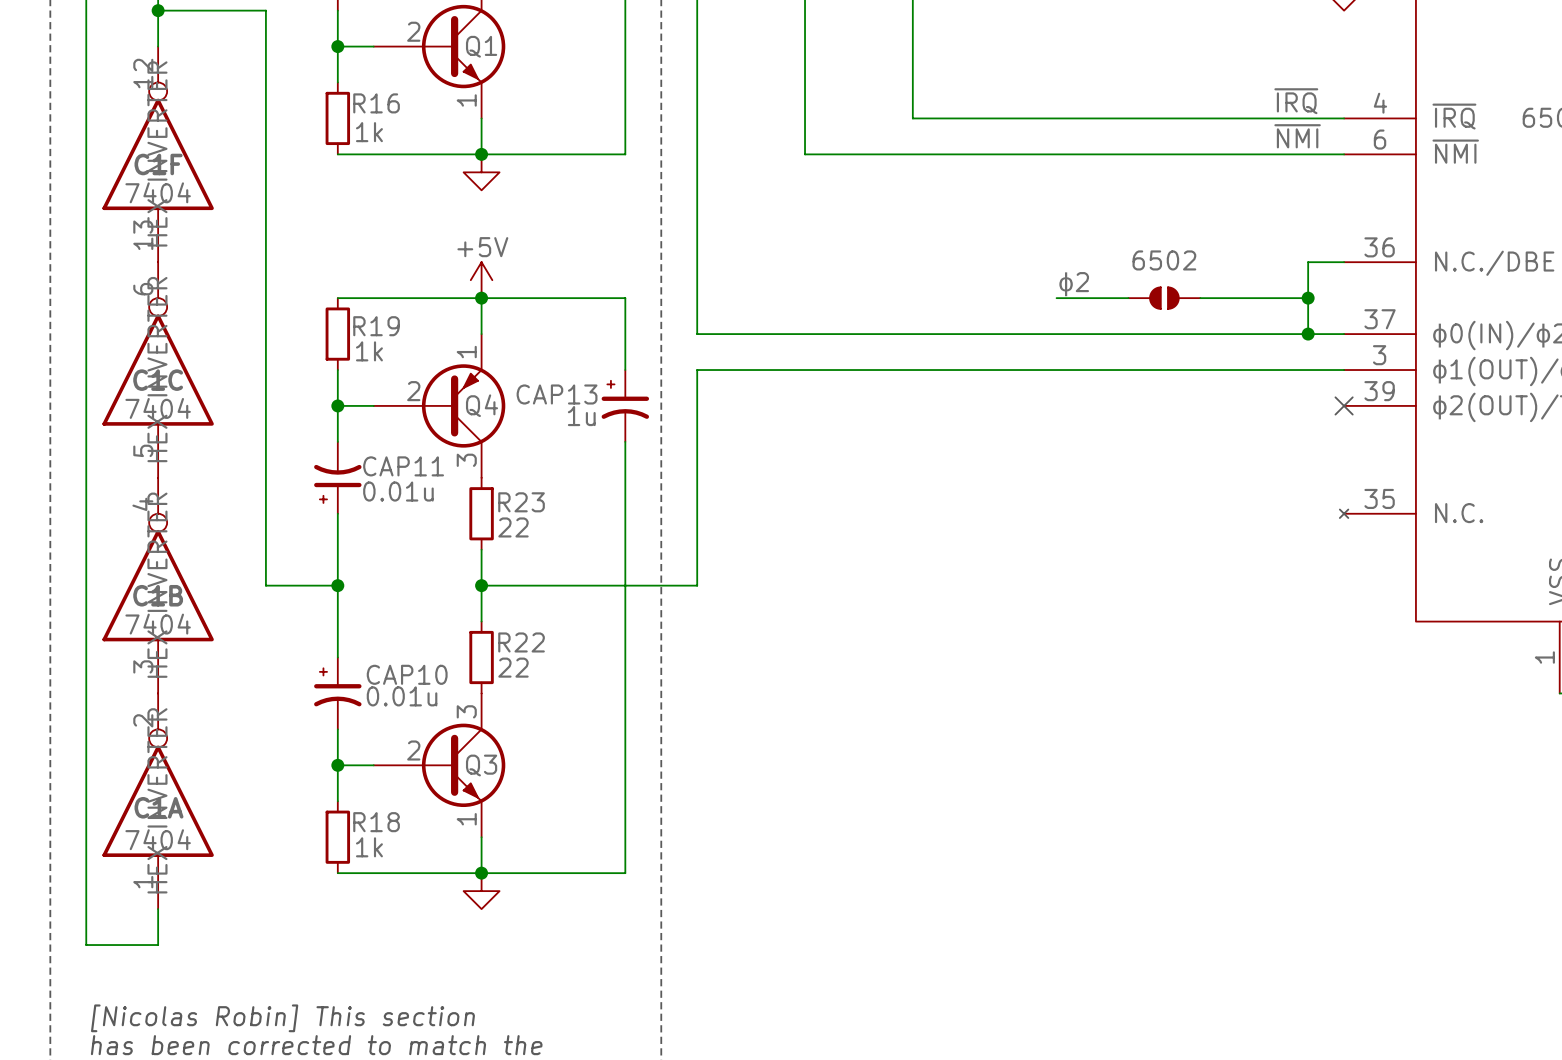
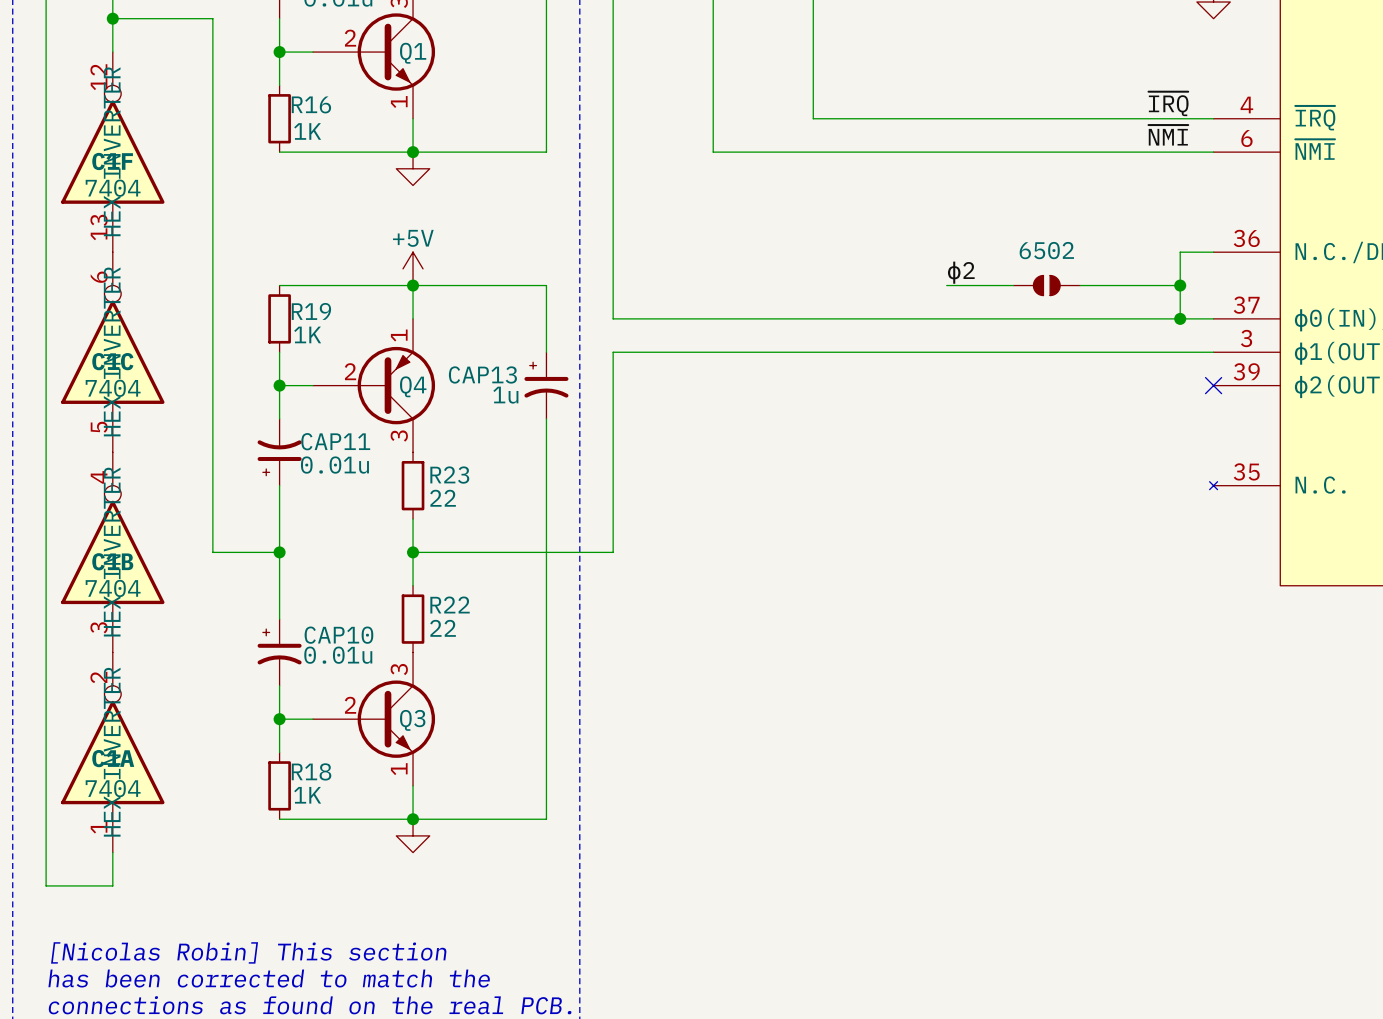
R16 value: 1k (369, 132) -> 1K (307, 131)
R19 value: 1k (369, 351) -> 1K (307, 334)
R18 value: 1k (369, 847) -> 1K (307, 795)

